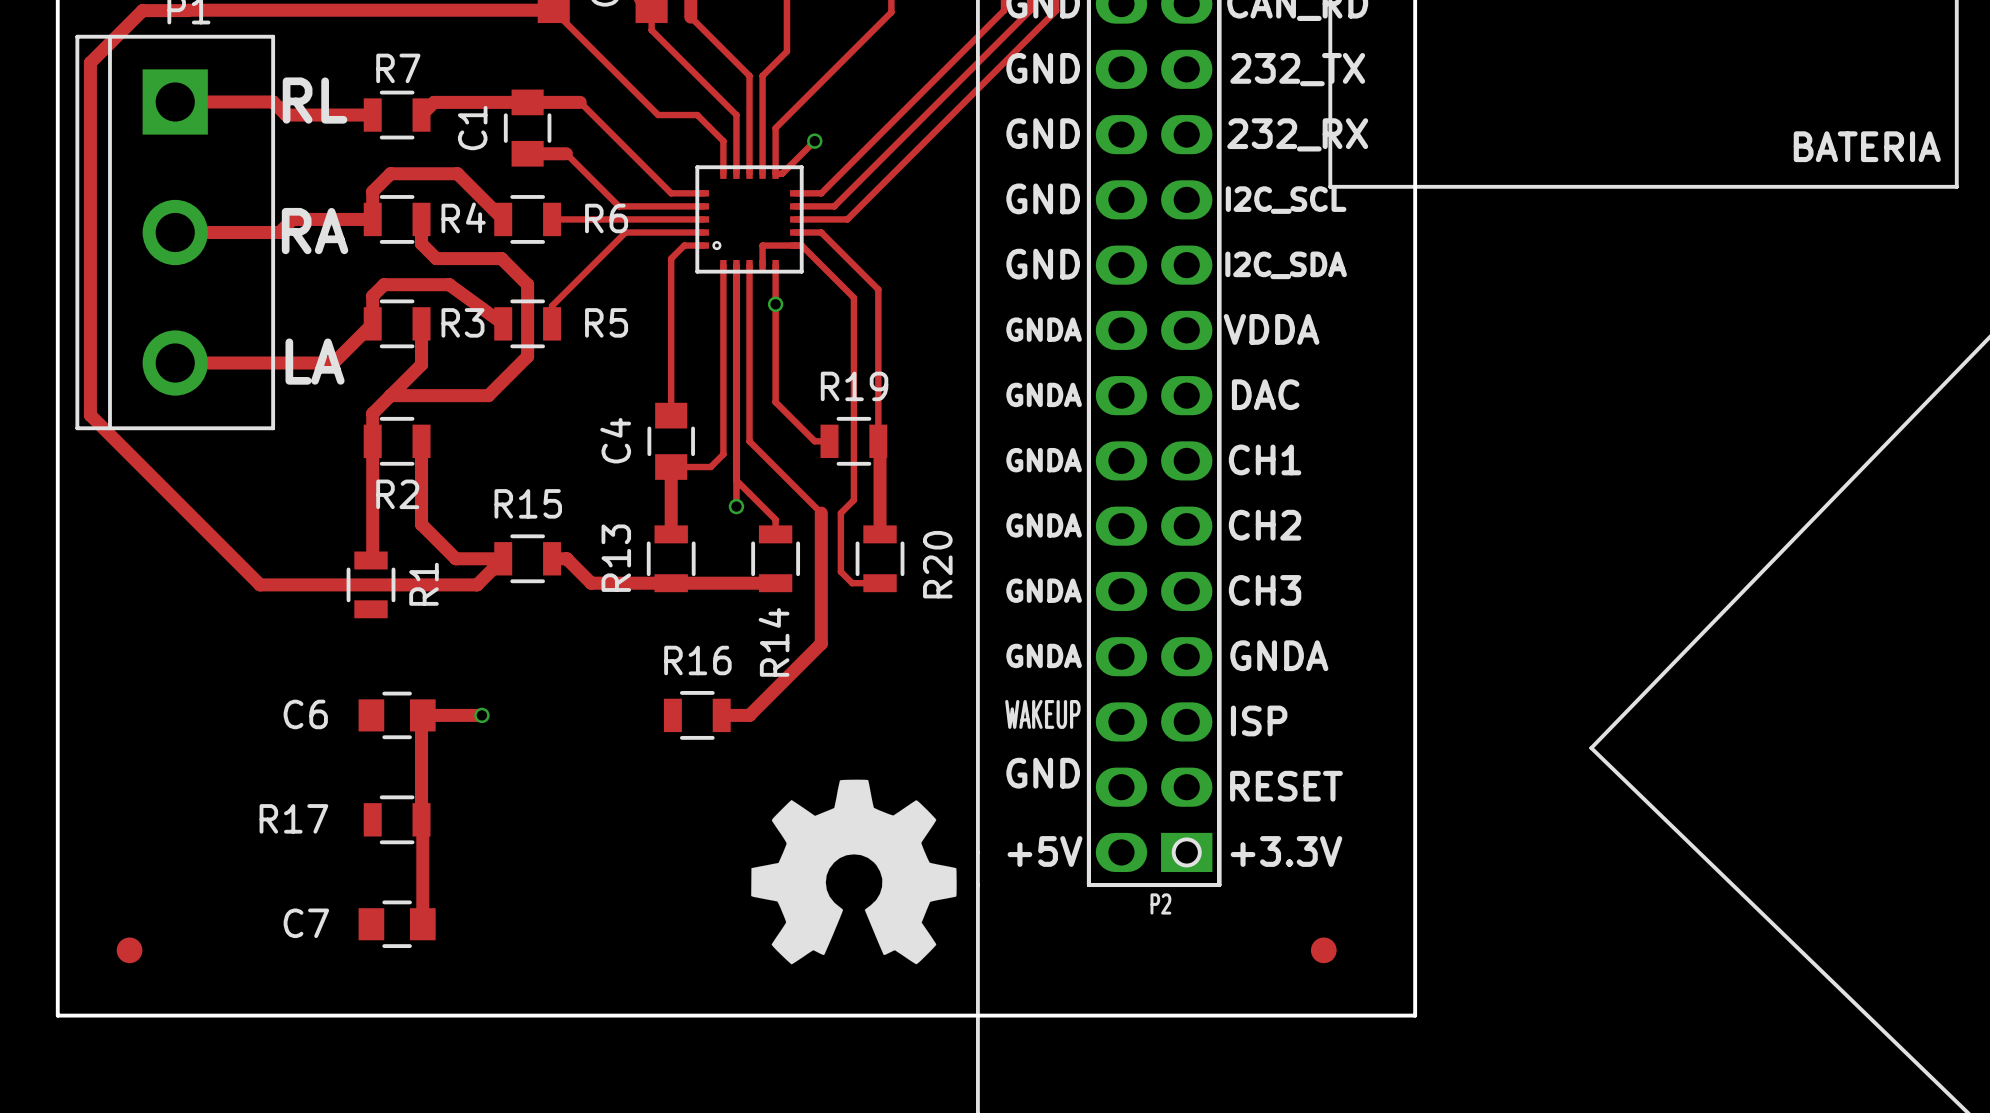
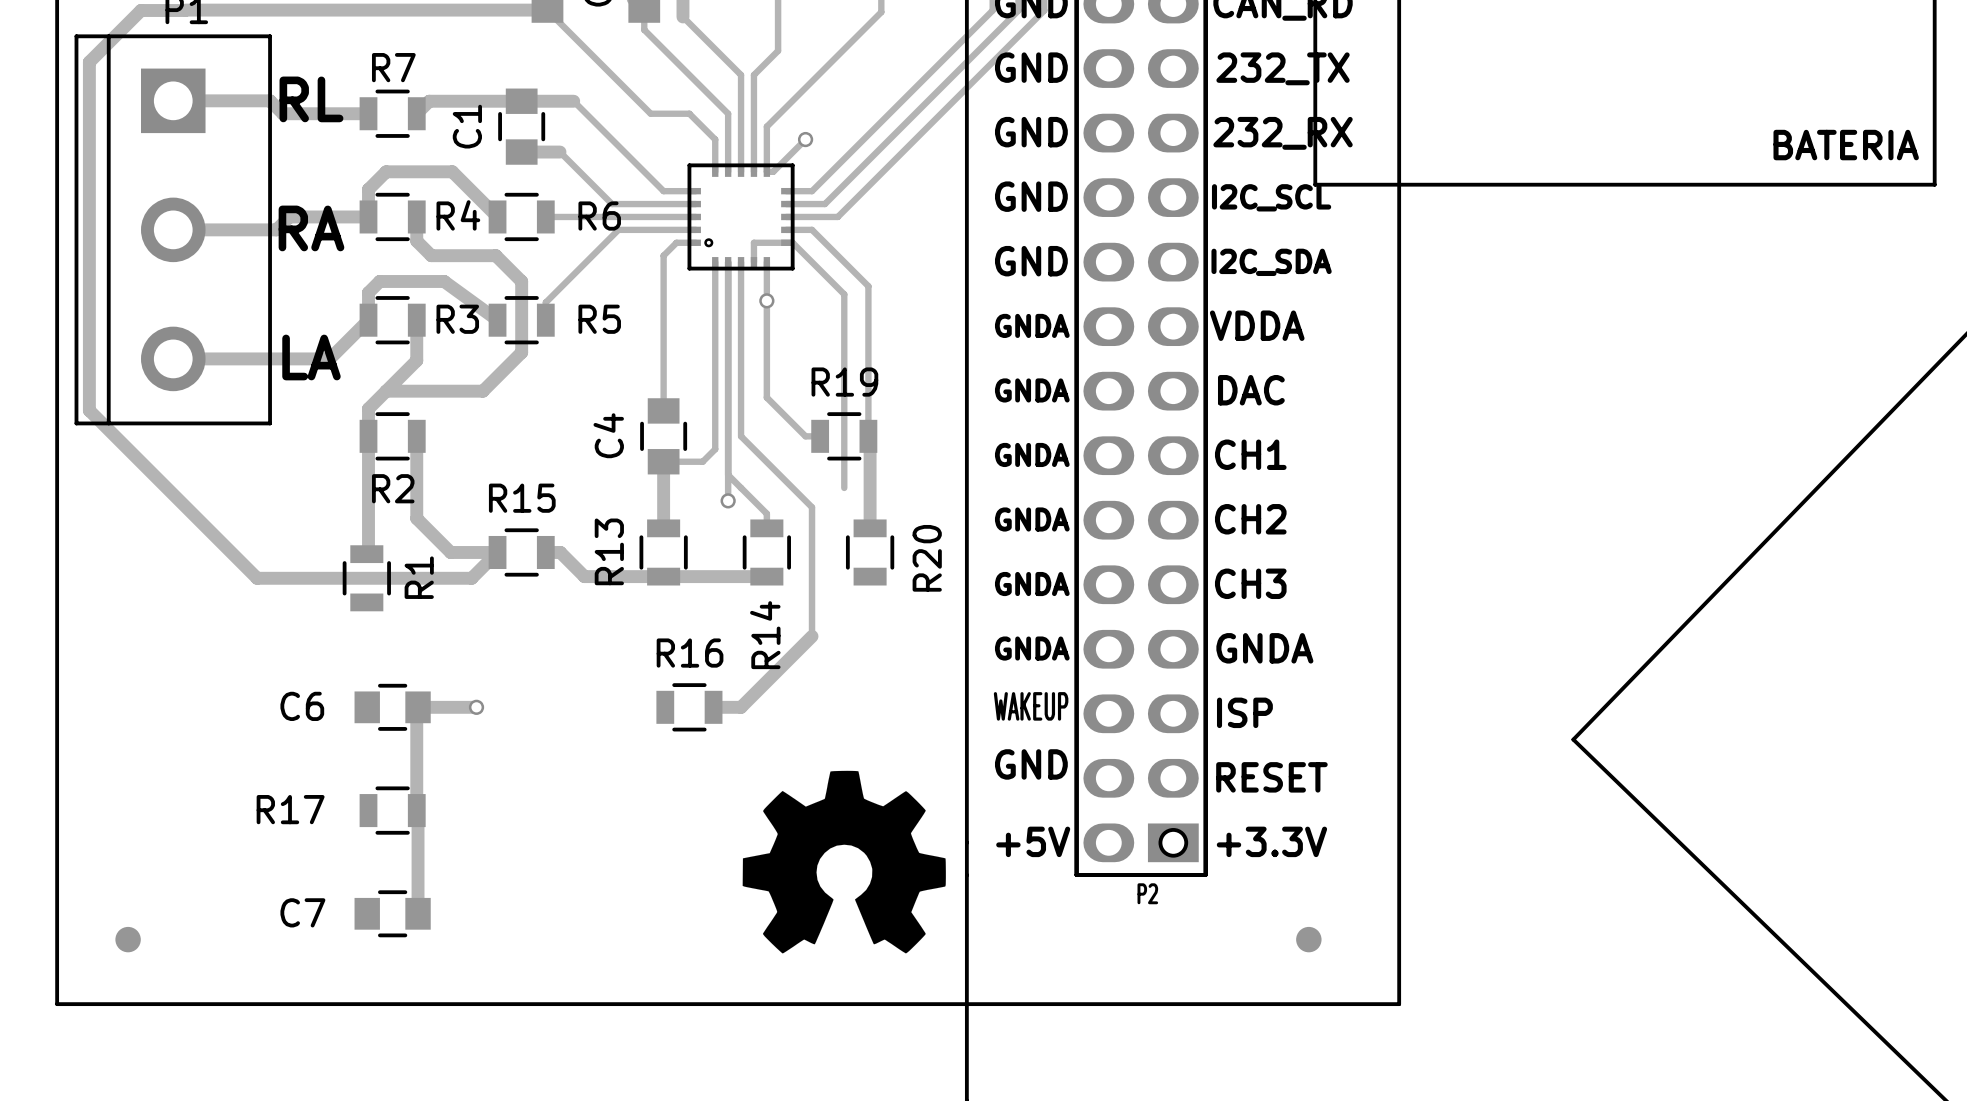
track: (853, 493) (853, 500) (840, 513) (840, 571) (852, 583) (880, 583) -> none
track width: thick (821, 513) (821, 643) -> thin (812, 507) (812, 636)

